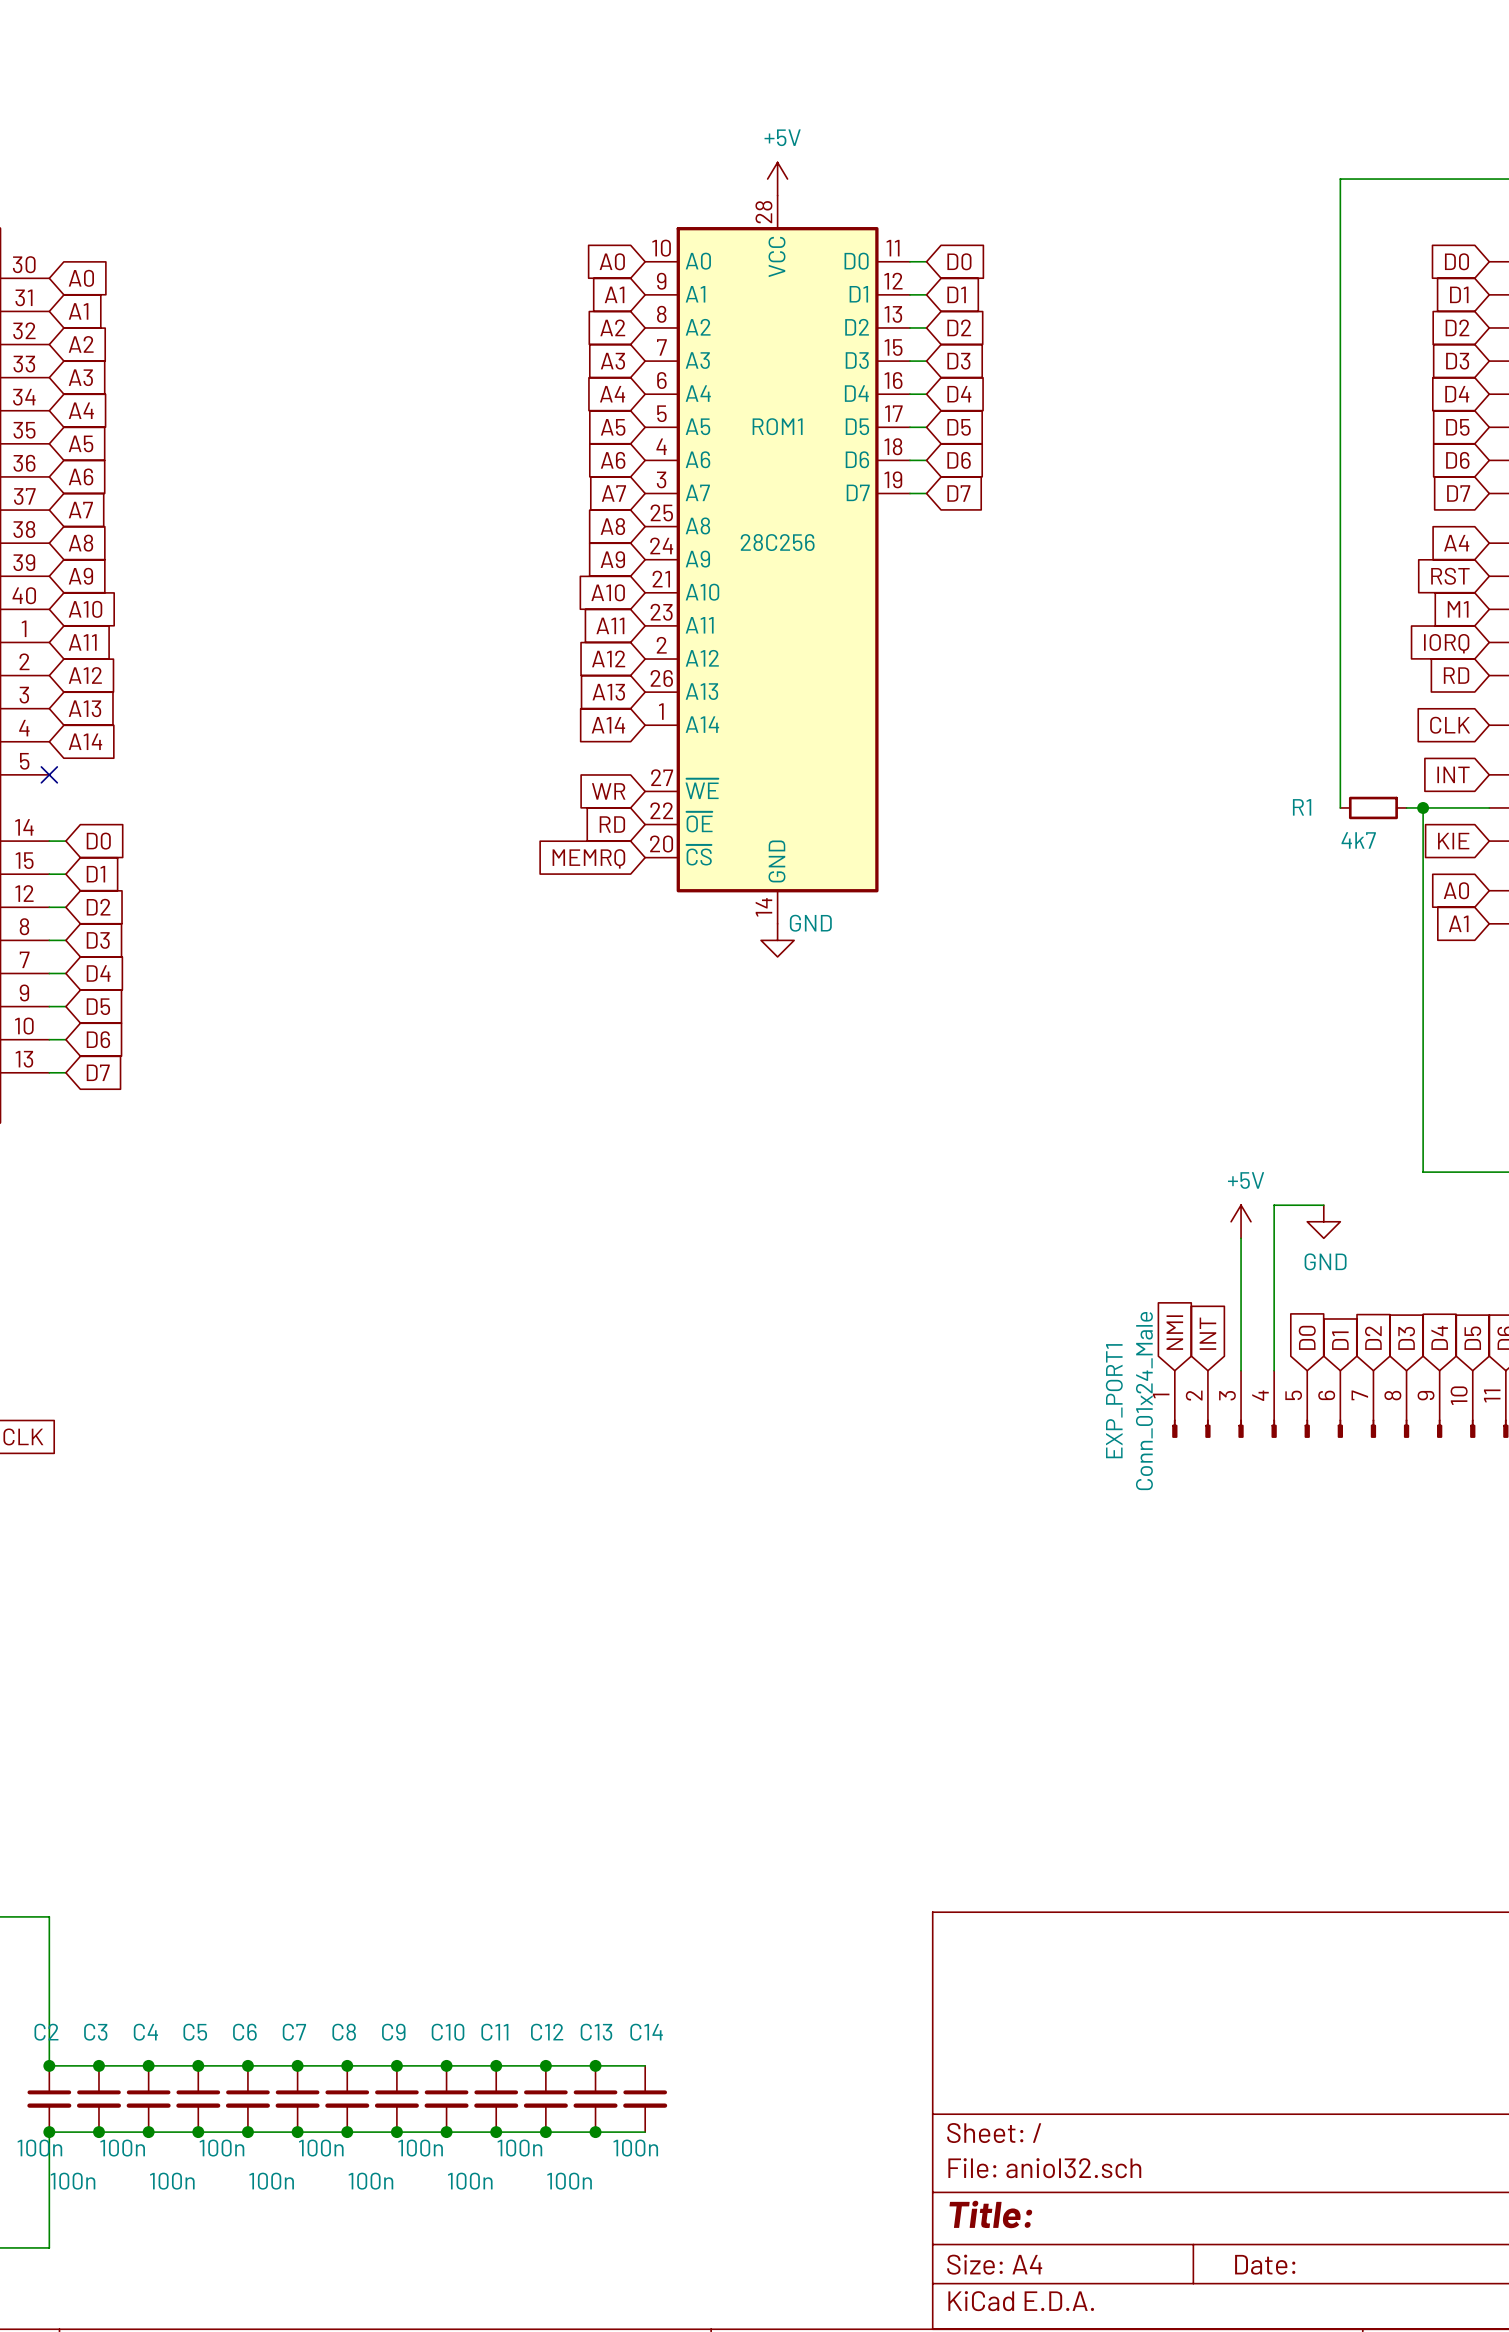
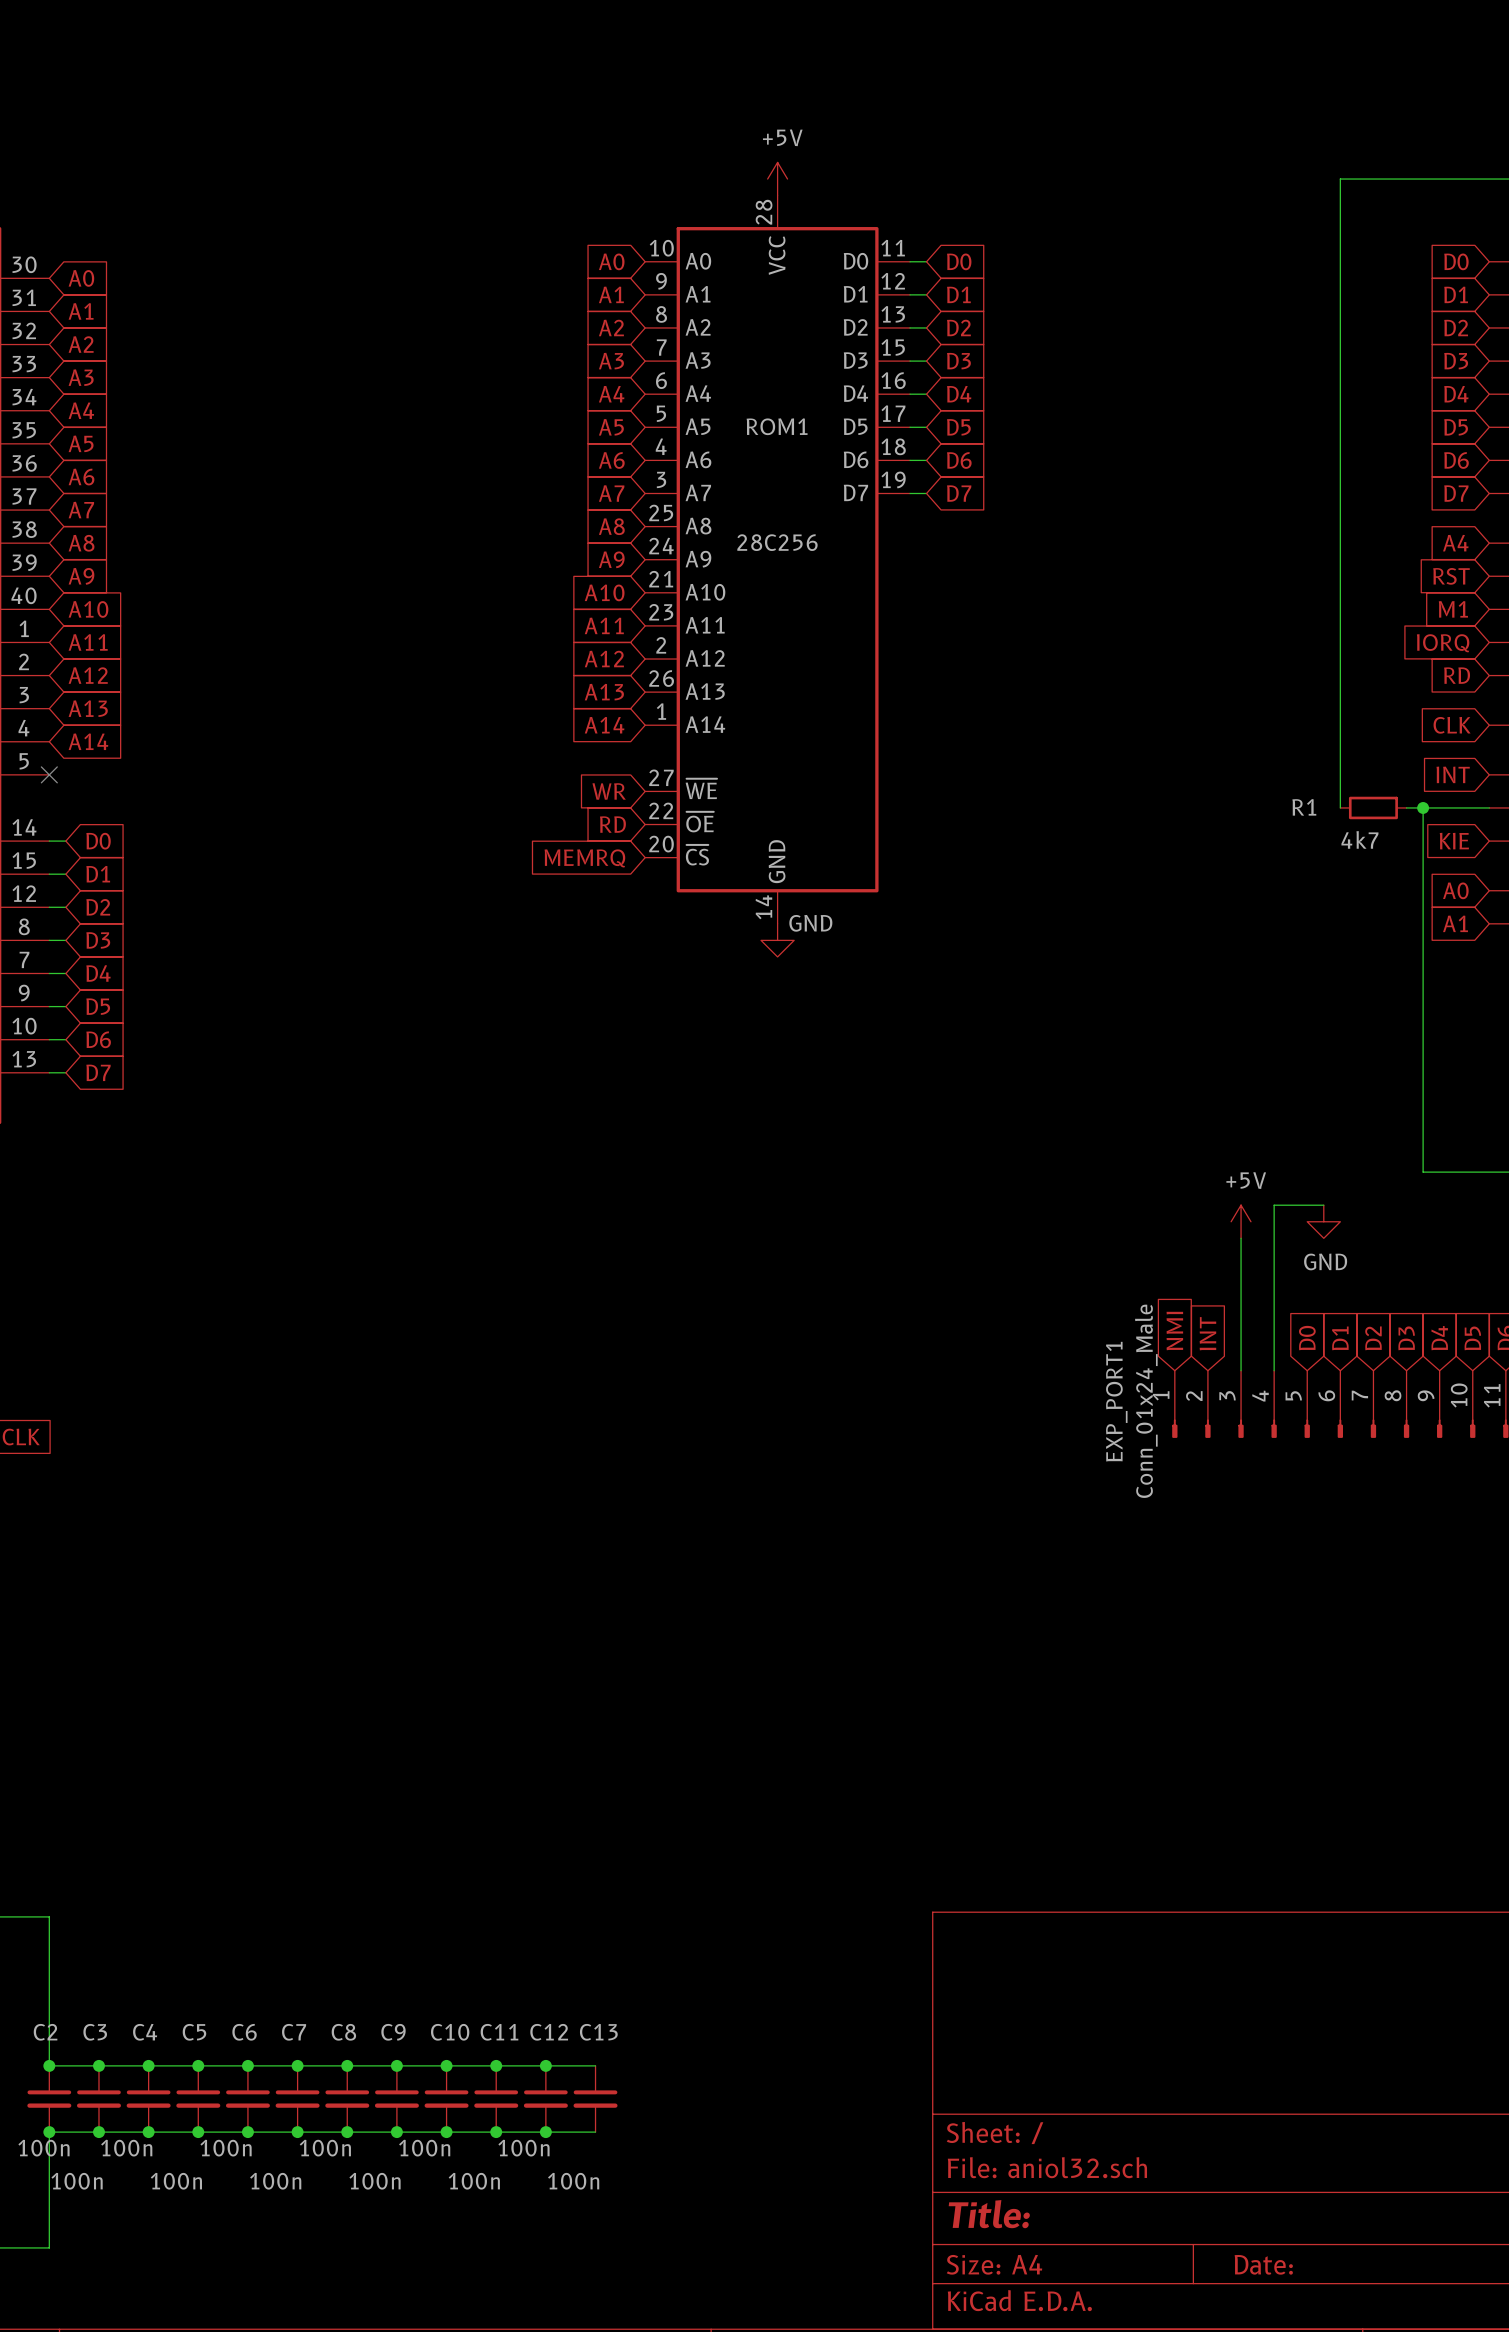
wire: (595, 2065) (645, 2065) -> none
junction: (595, 2065) -> none
C14: 100n (645, 2098) -> none
wire: (595, 2132) (645, 2132) -> none
junction: (595, 2132) -> none

